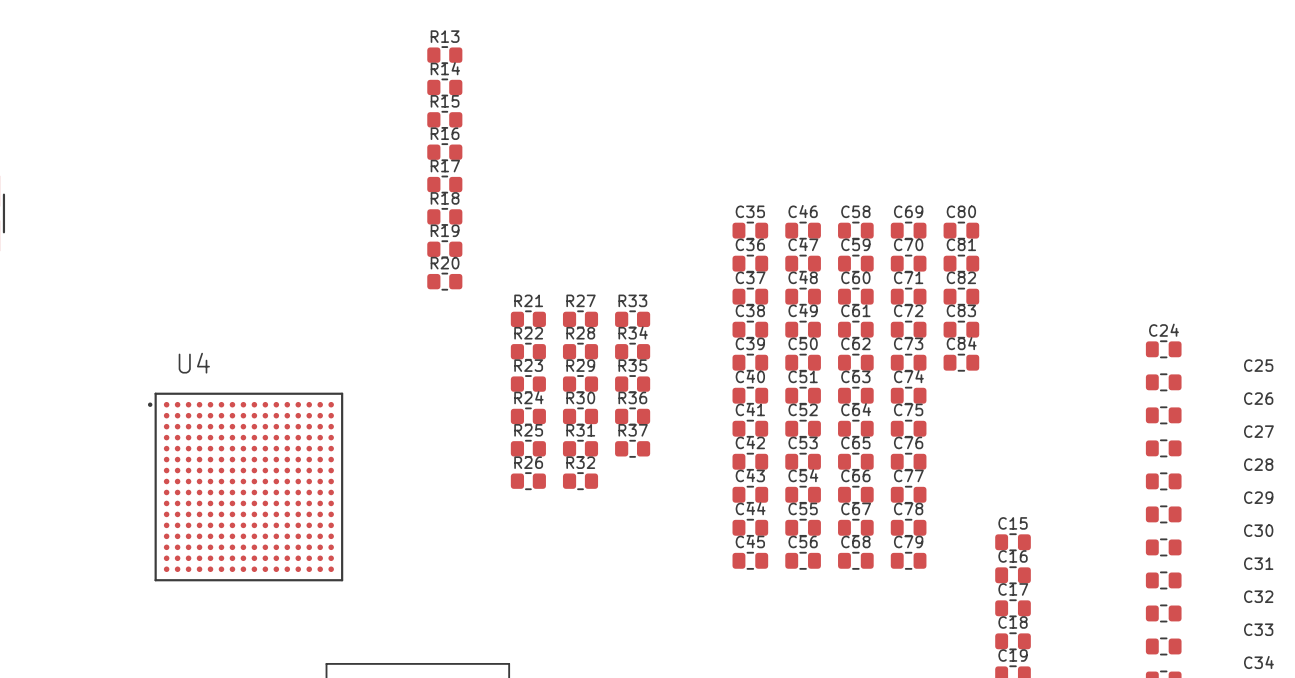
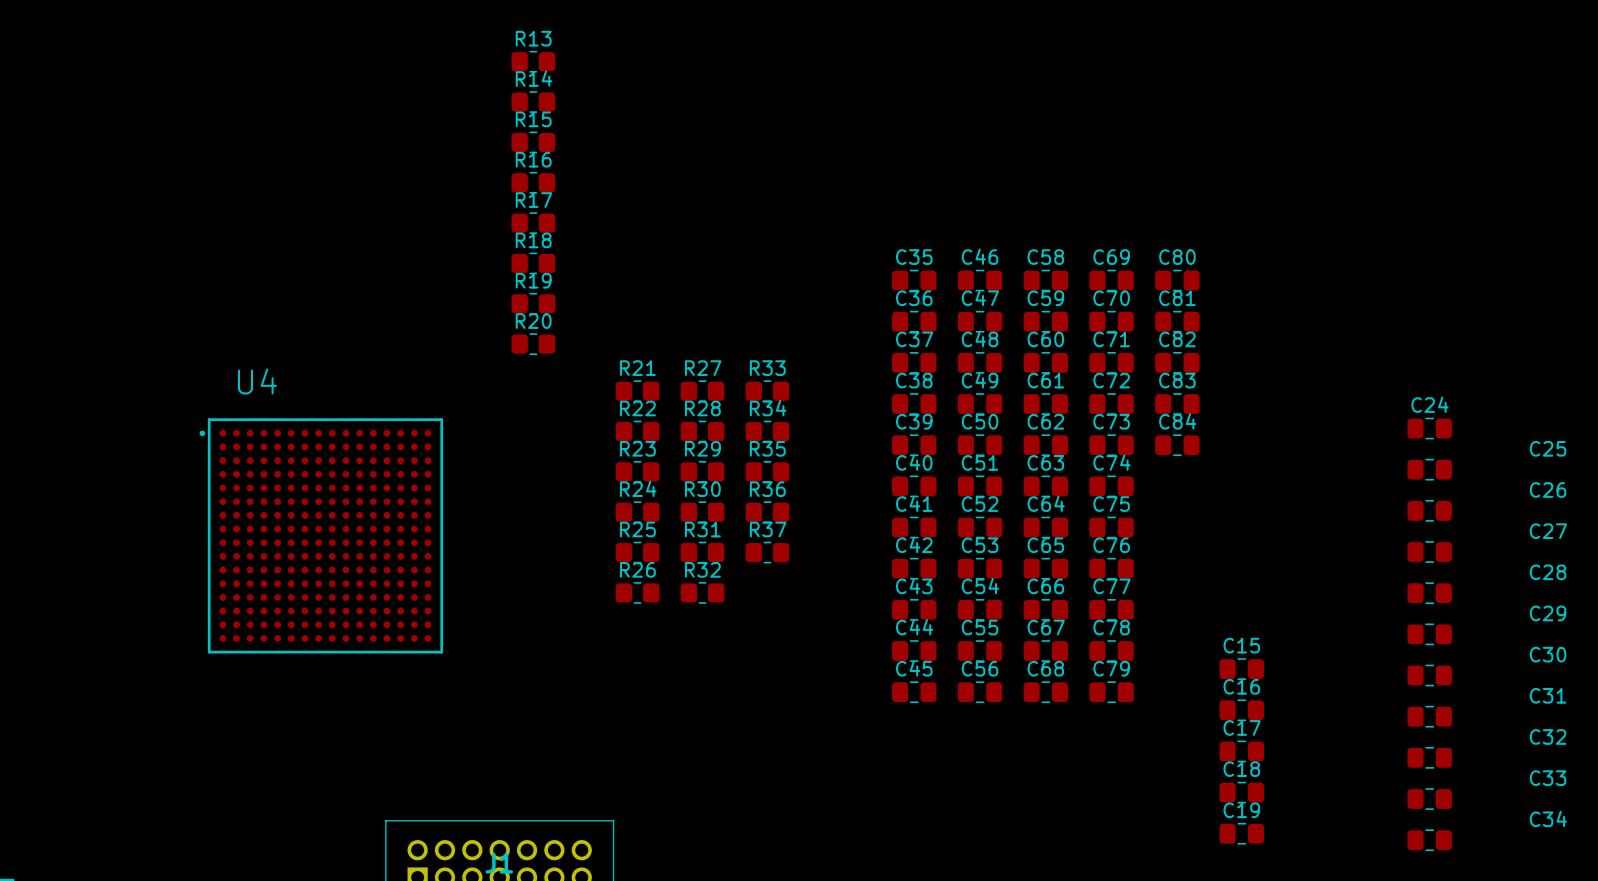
U4 position: (245, 486) -> (321, 535)

